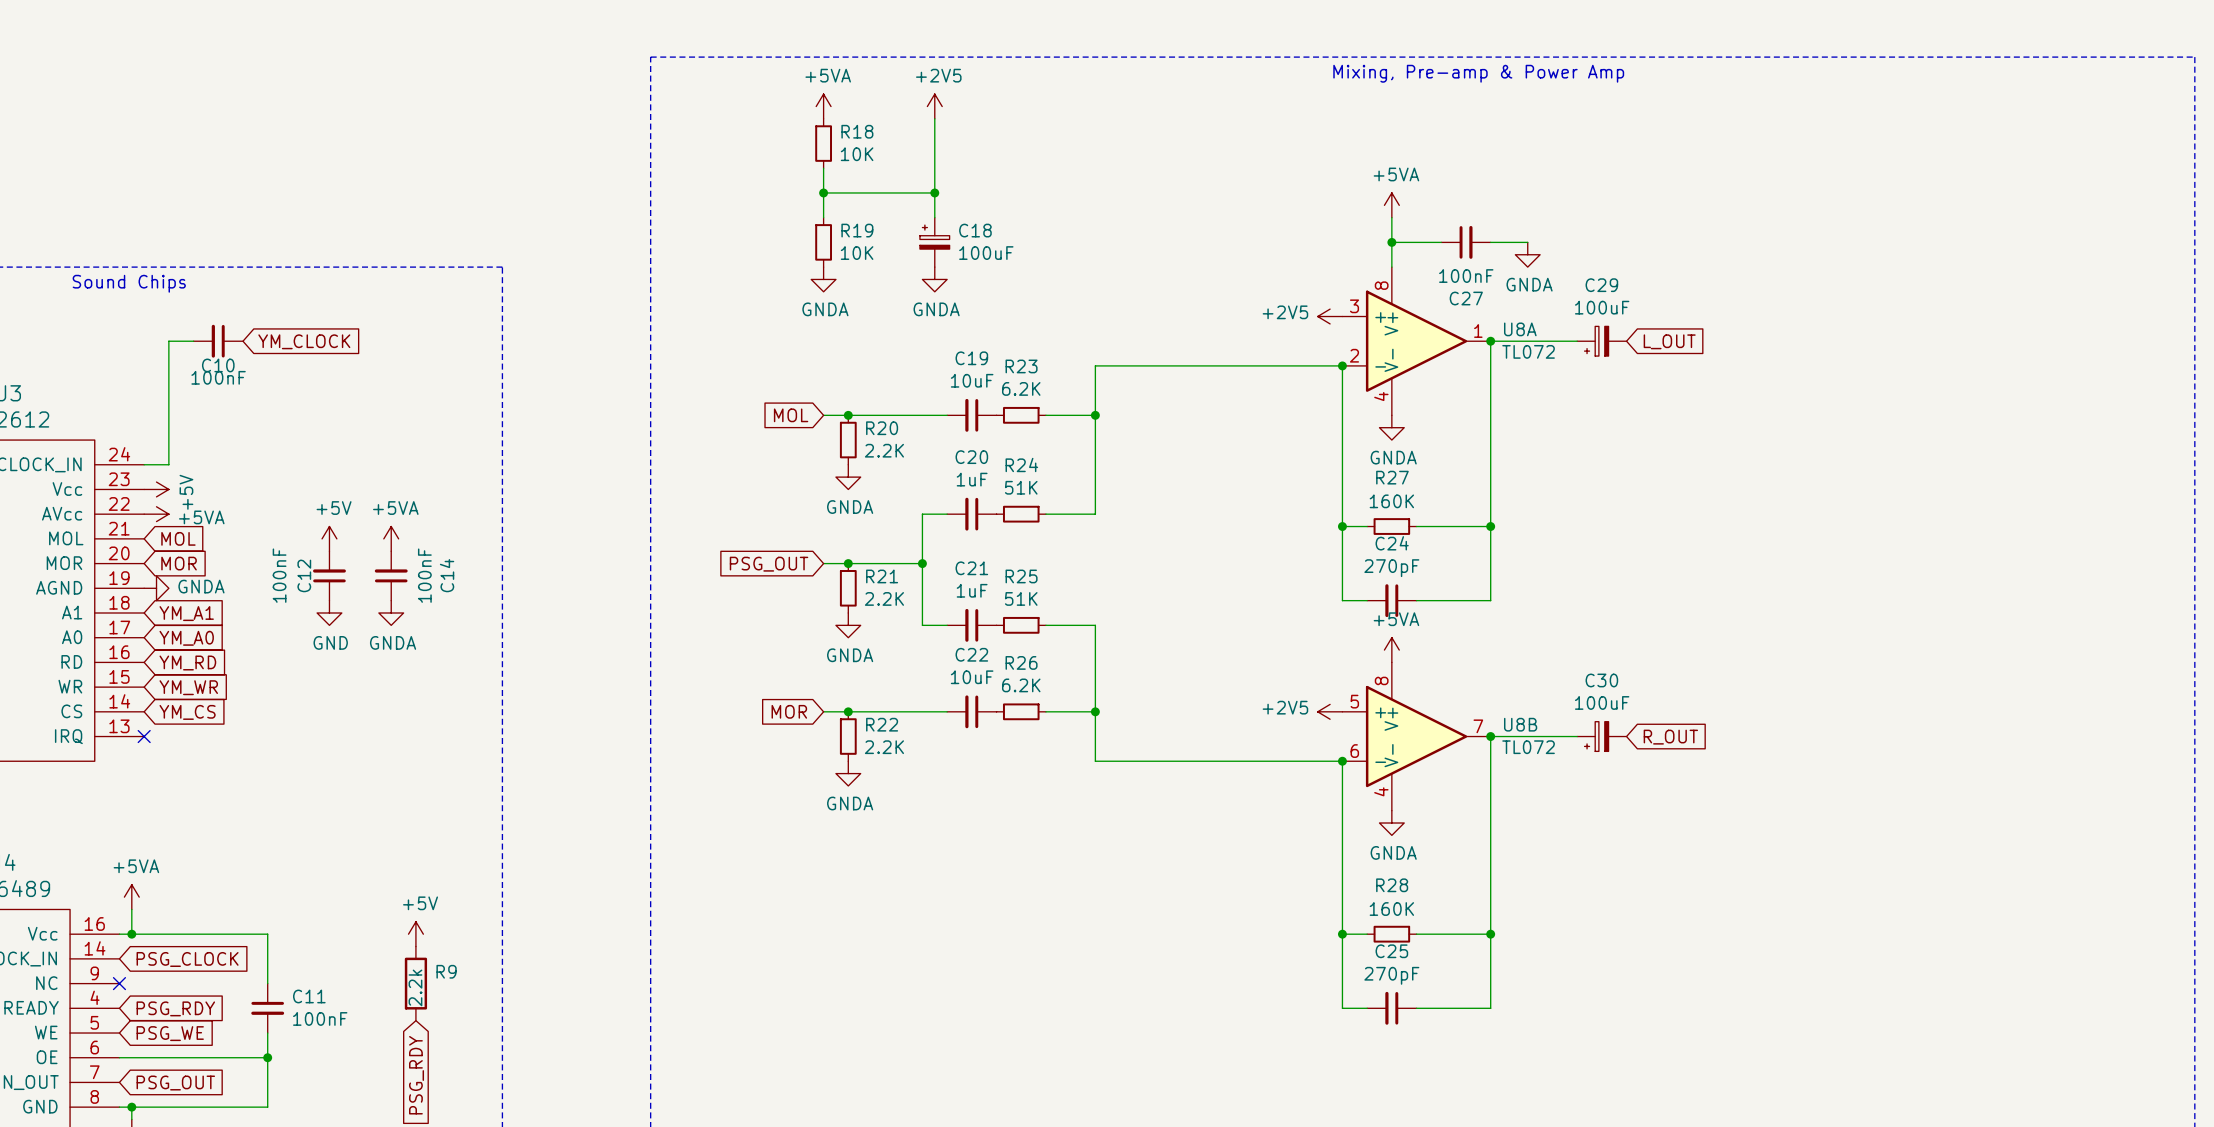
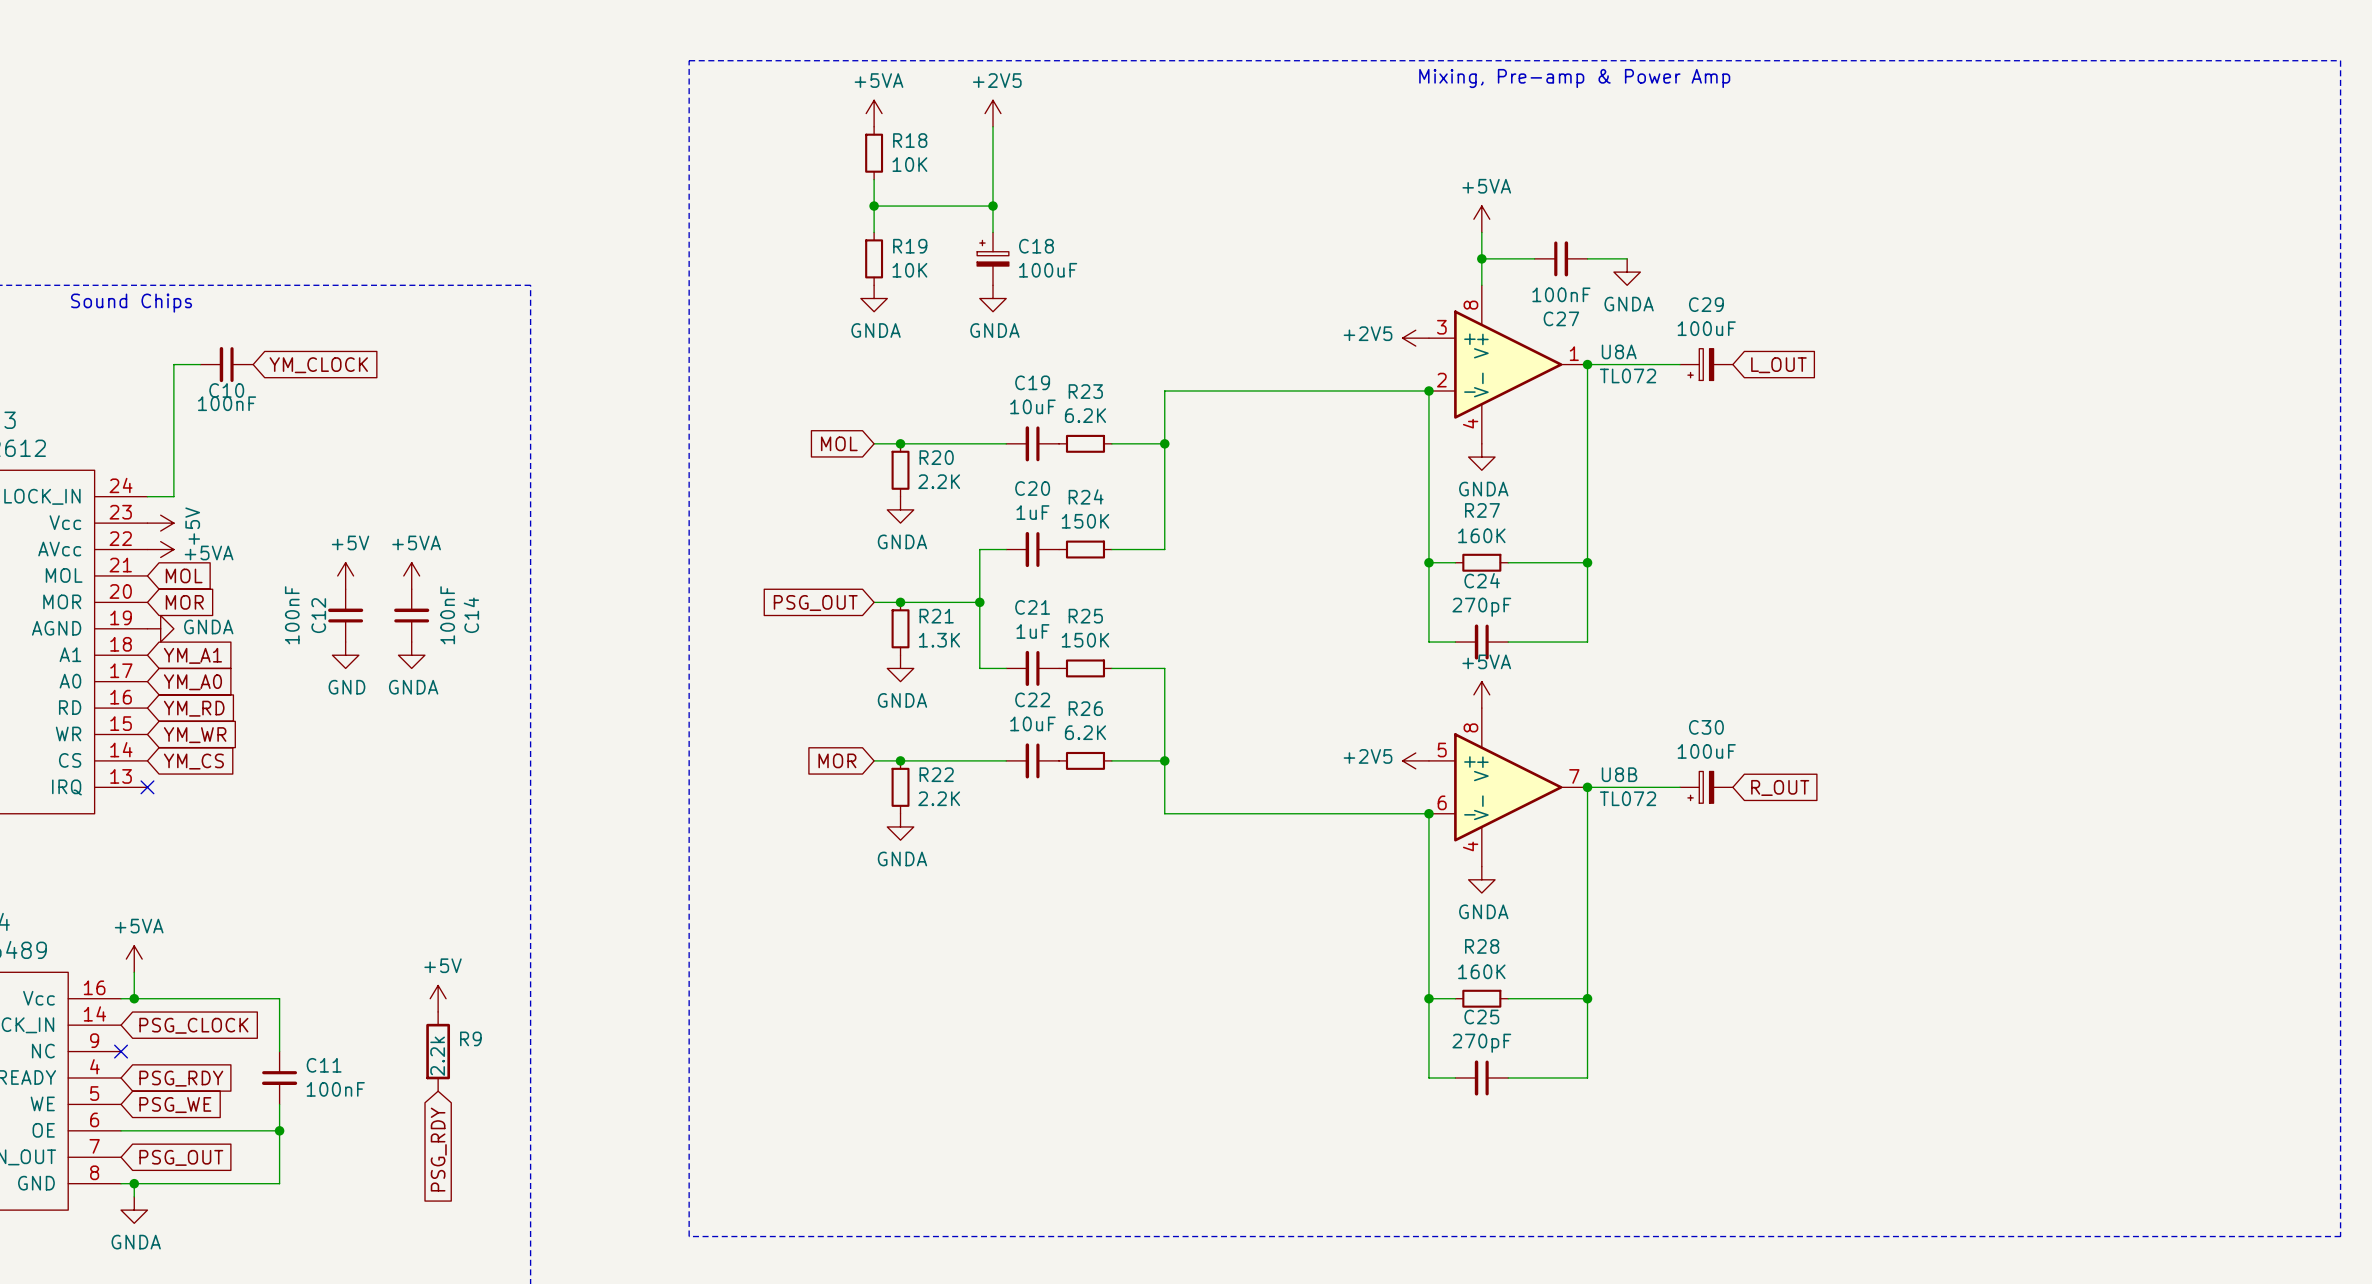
R24 value: 51K (1021, 487) -> 150K (1085, 521)
R21 value: 2.2K (884, 598) -> 1.3K (939, 640)
R25 value: 51K (1021, 598) -> 150K (1085, 640)

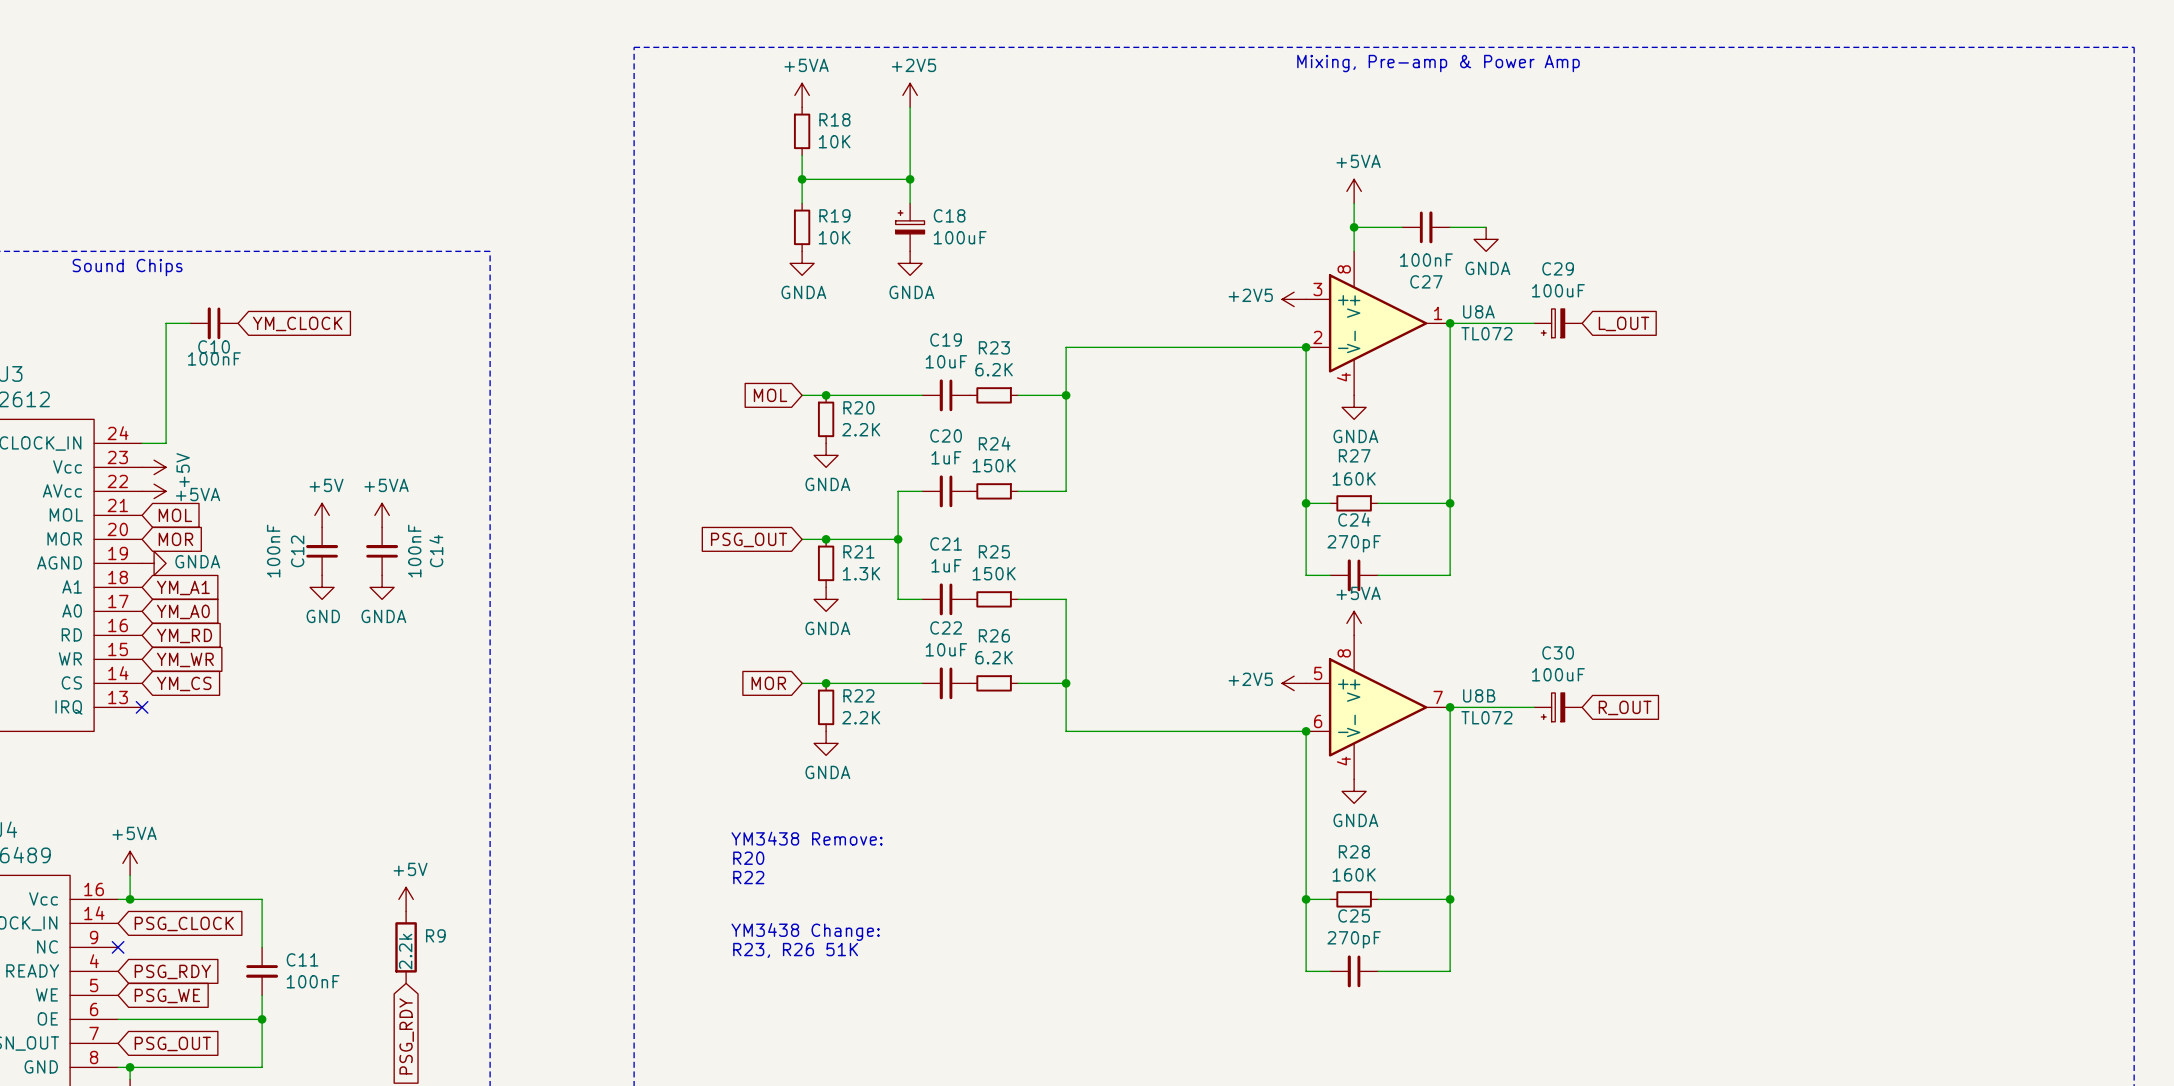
text: none -> YM3438 Remove: (807, 838)
text: none -> R20 (748, 858)
text: none -> R22 (748, 877)
text: none -> YM3438 Change: (805, 931)
text: none -> R23, R26 51K (795, 950)

